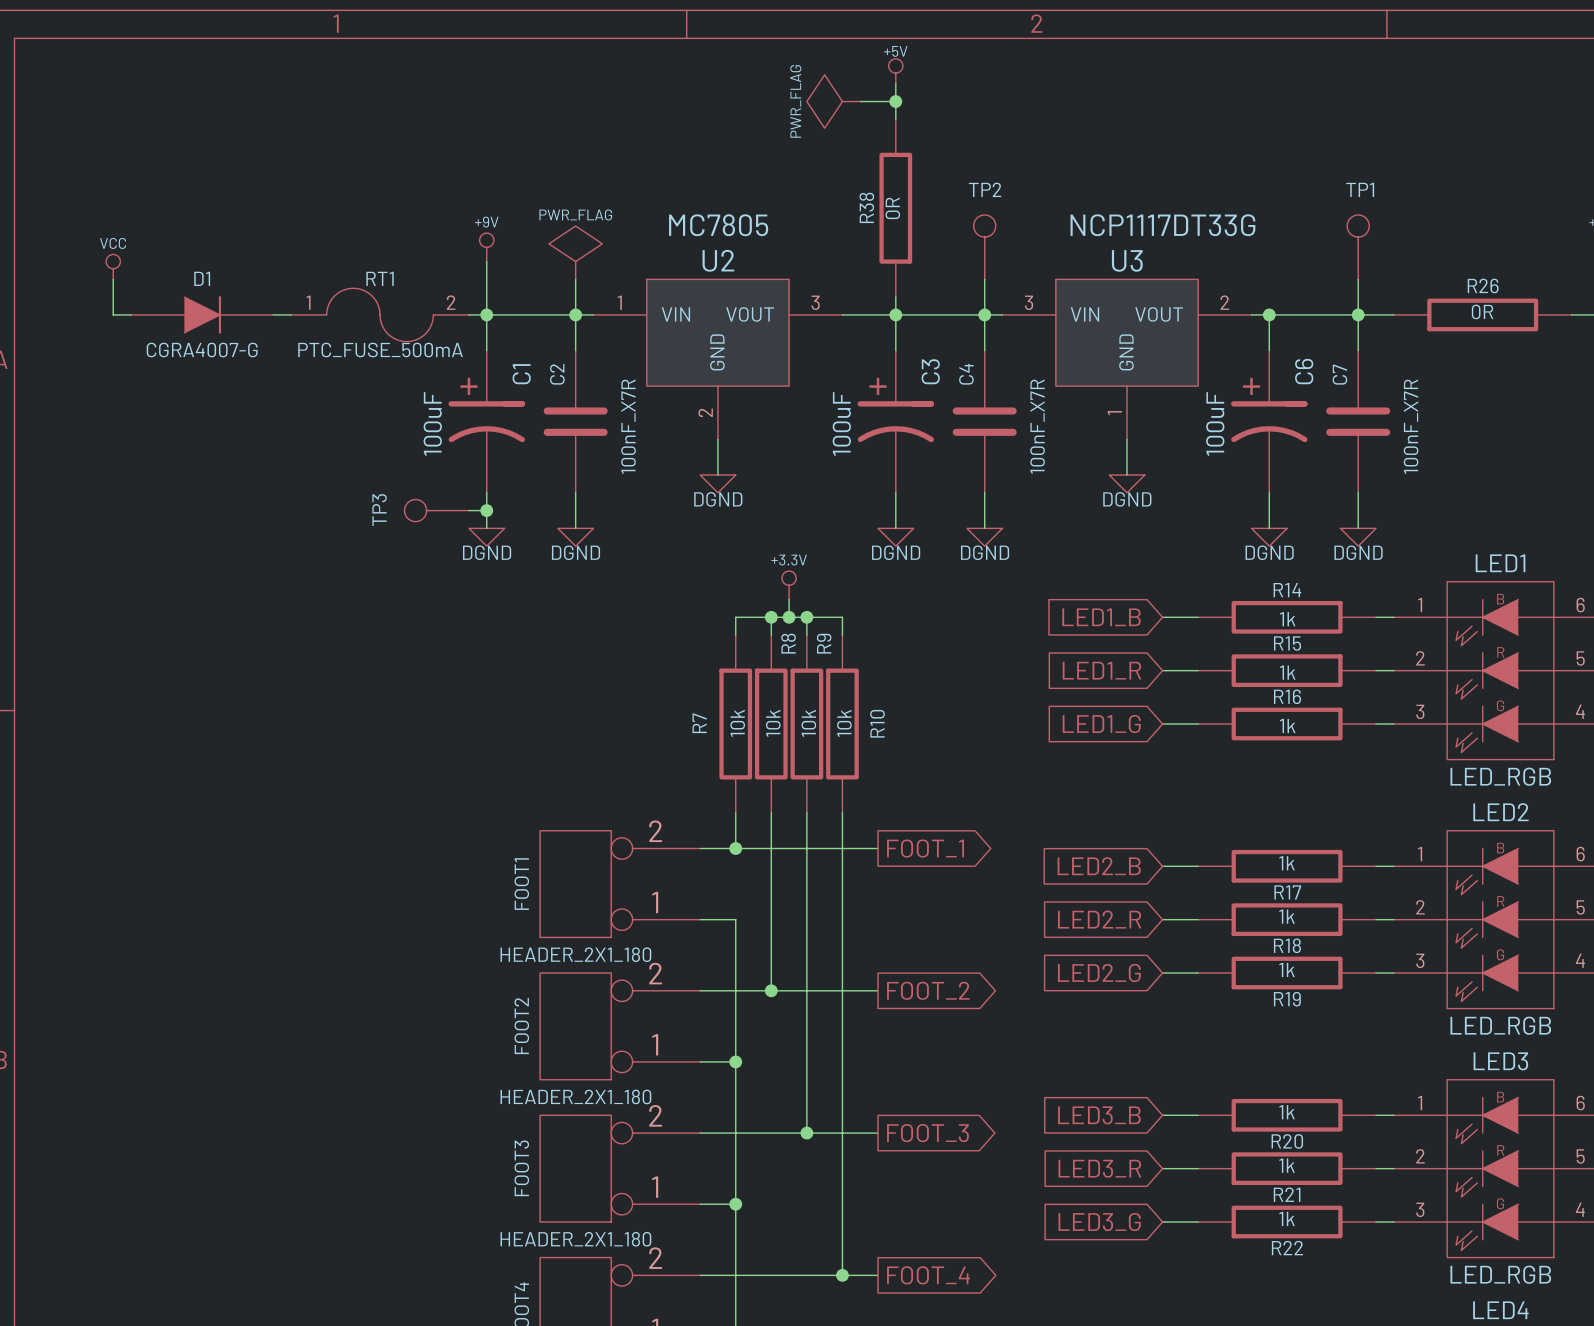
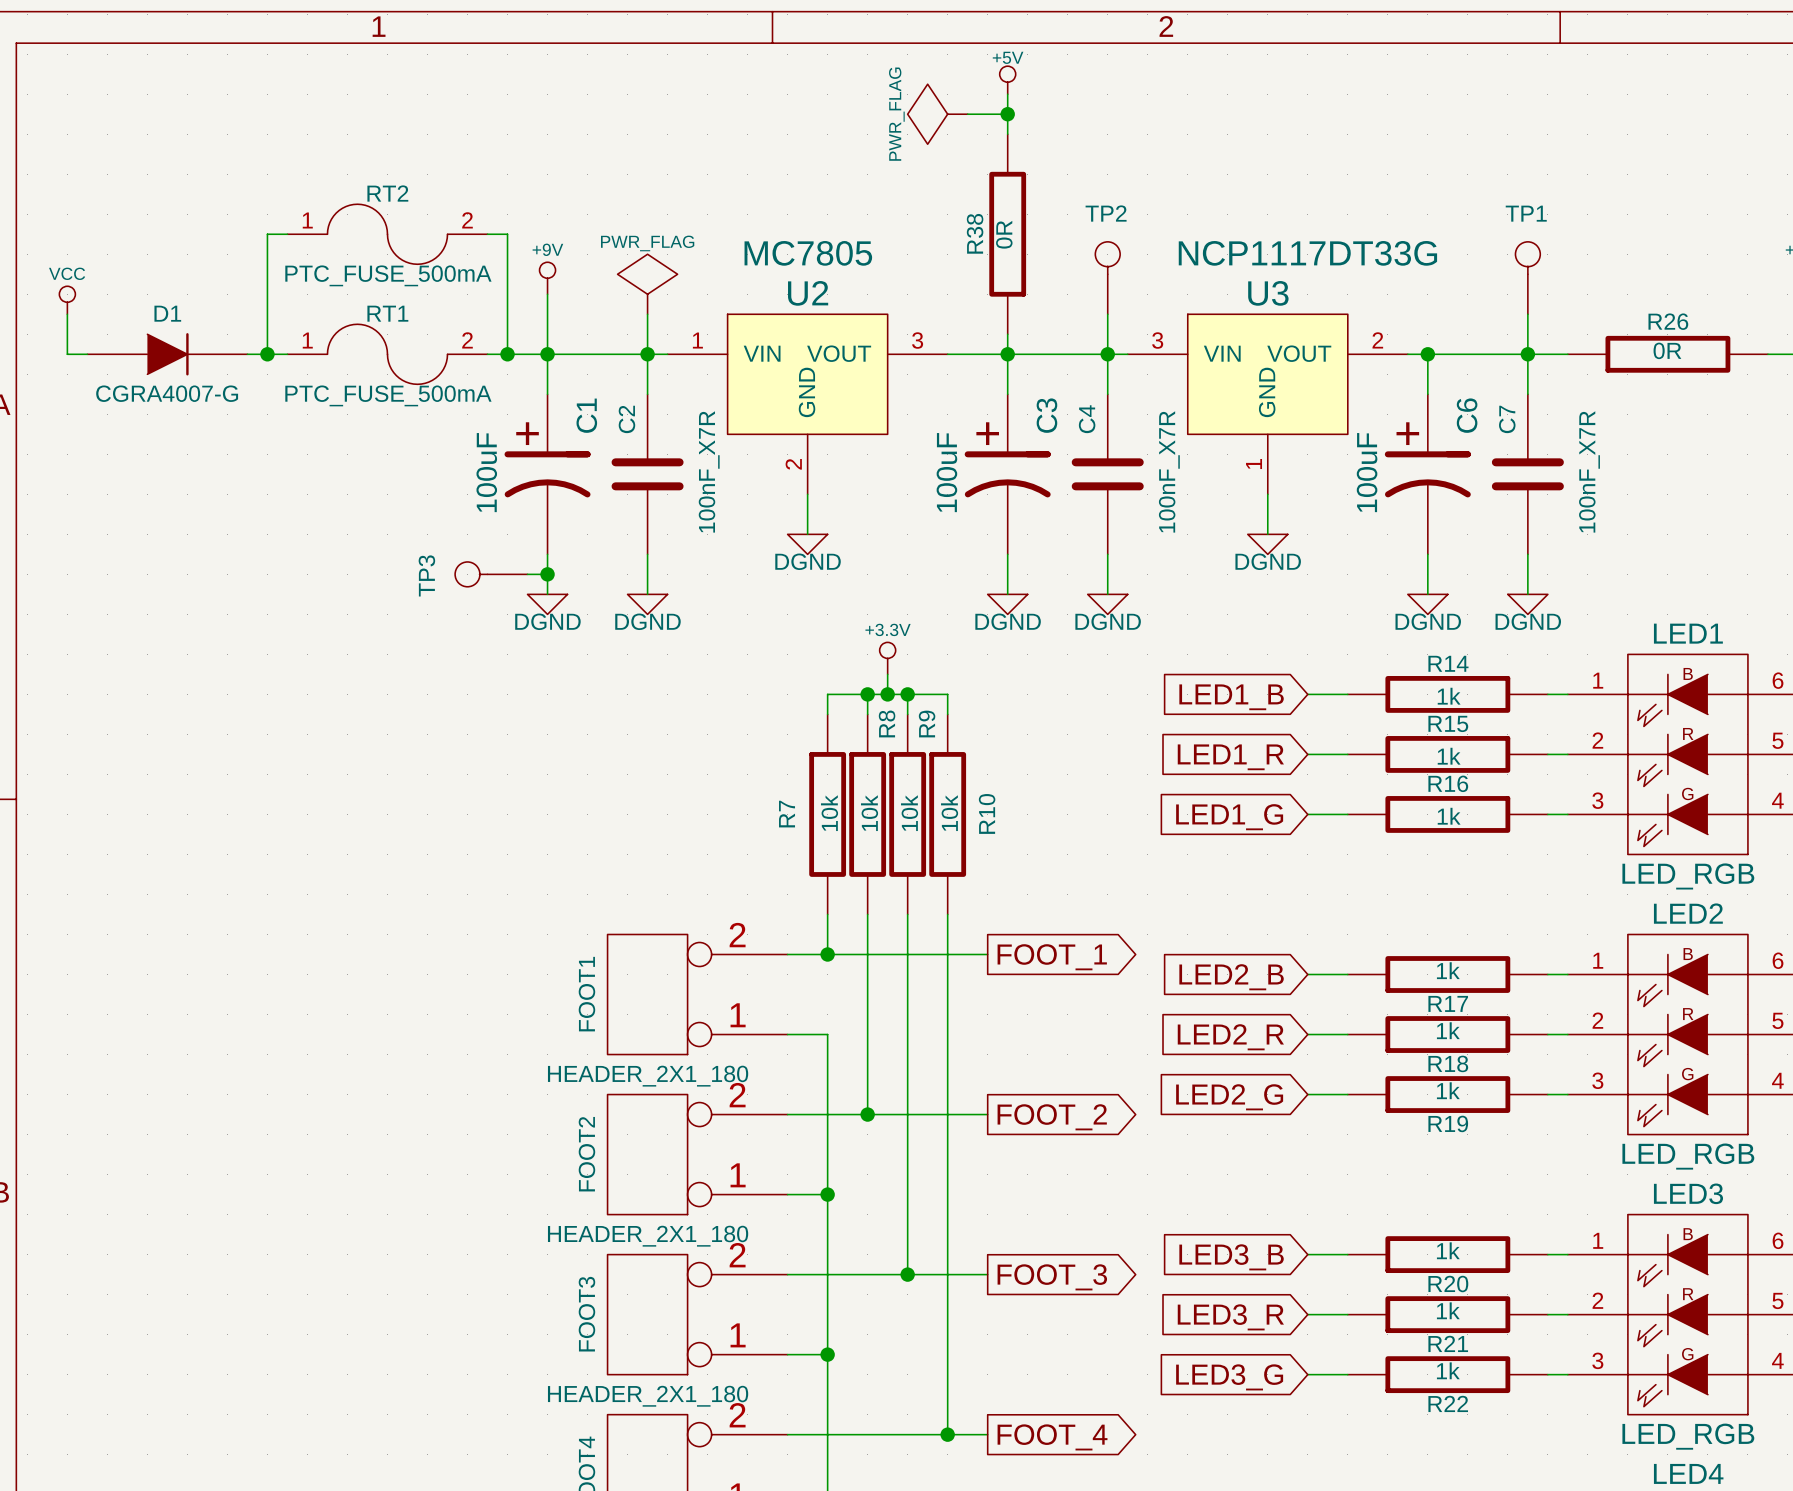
wire: none -> (287, 234) (267, 234) (267, 354)
RT2: none -> PTC_FUSE_500mA (387, 234)
wire: none -> (487, 234) (507, 234) (507, 354)
power symbol position: VCC (113, 266) -> VCC (67, 300)
wire: (113, 279) (113, 314) (131, 314) -> (67, 314) (67, 354) (87, 354)
D1 position: (202, 314) -> (167, 354)
junction: none -> (267, 354)
RT1 position: (380, 314) -> (387, 354)
junction: none -> (507, 354)

